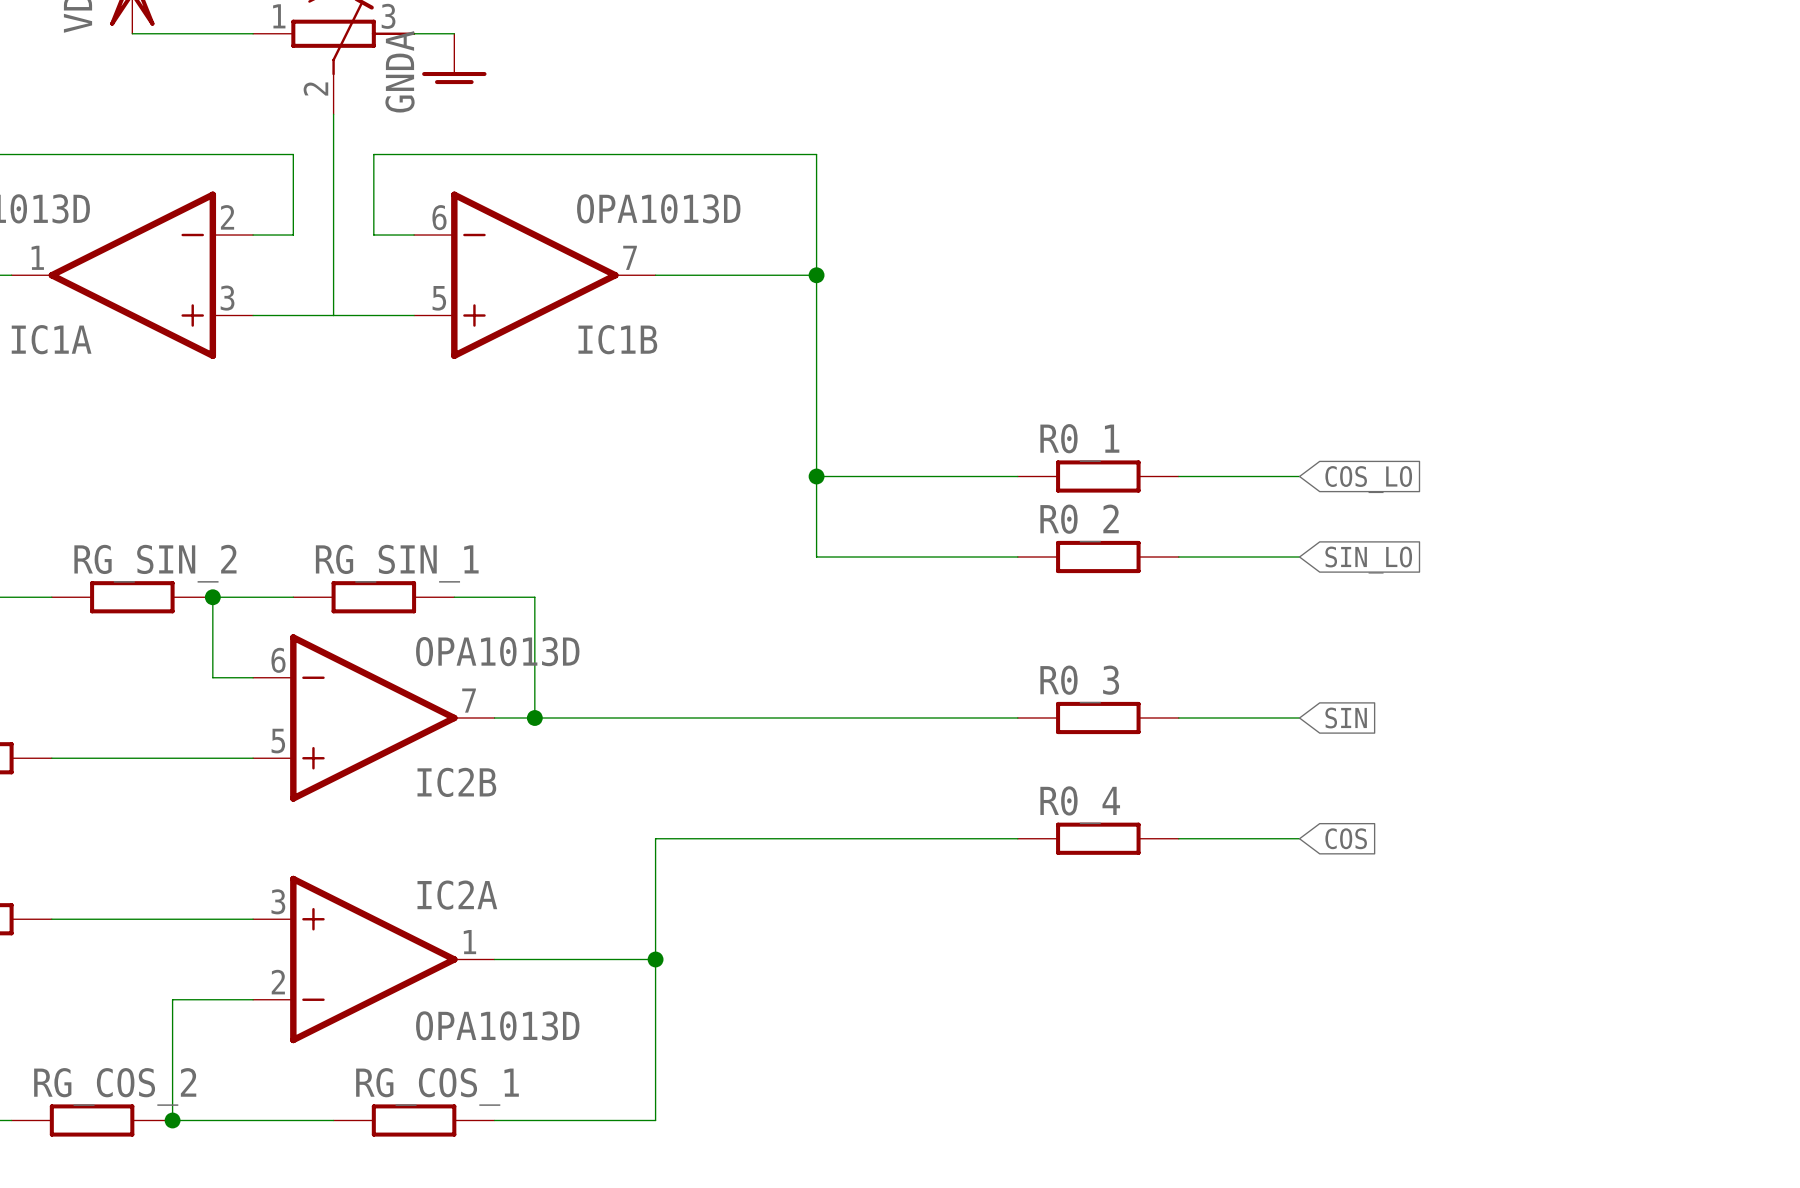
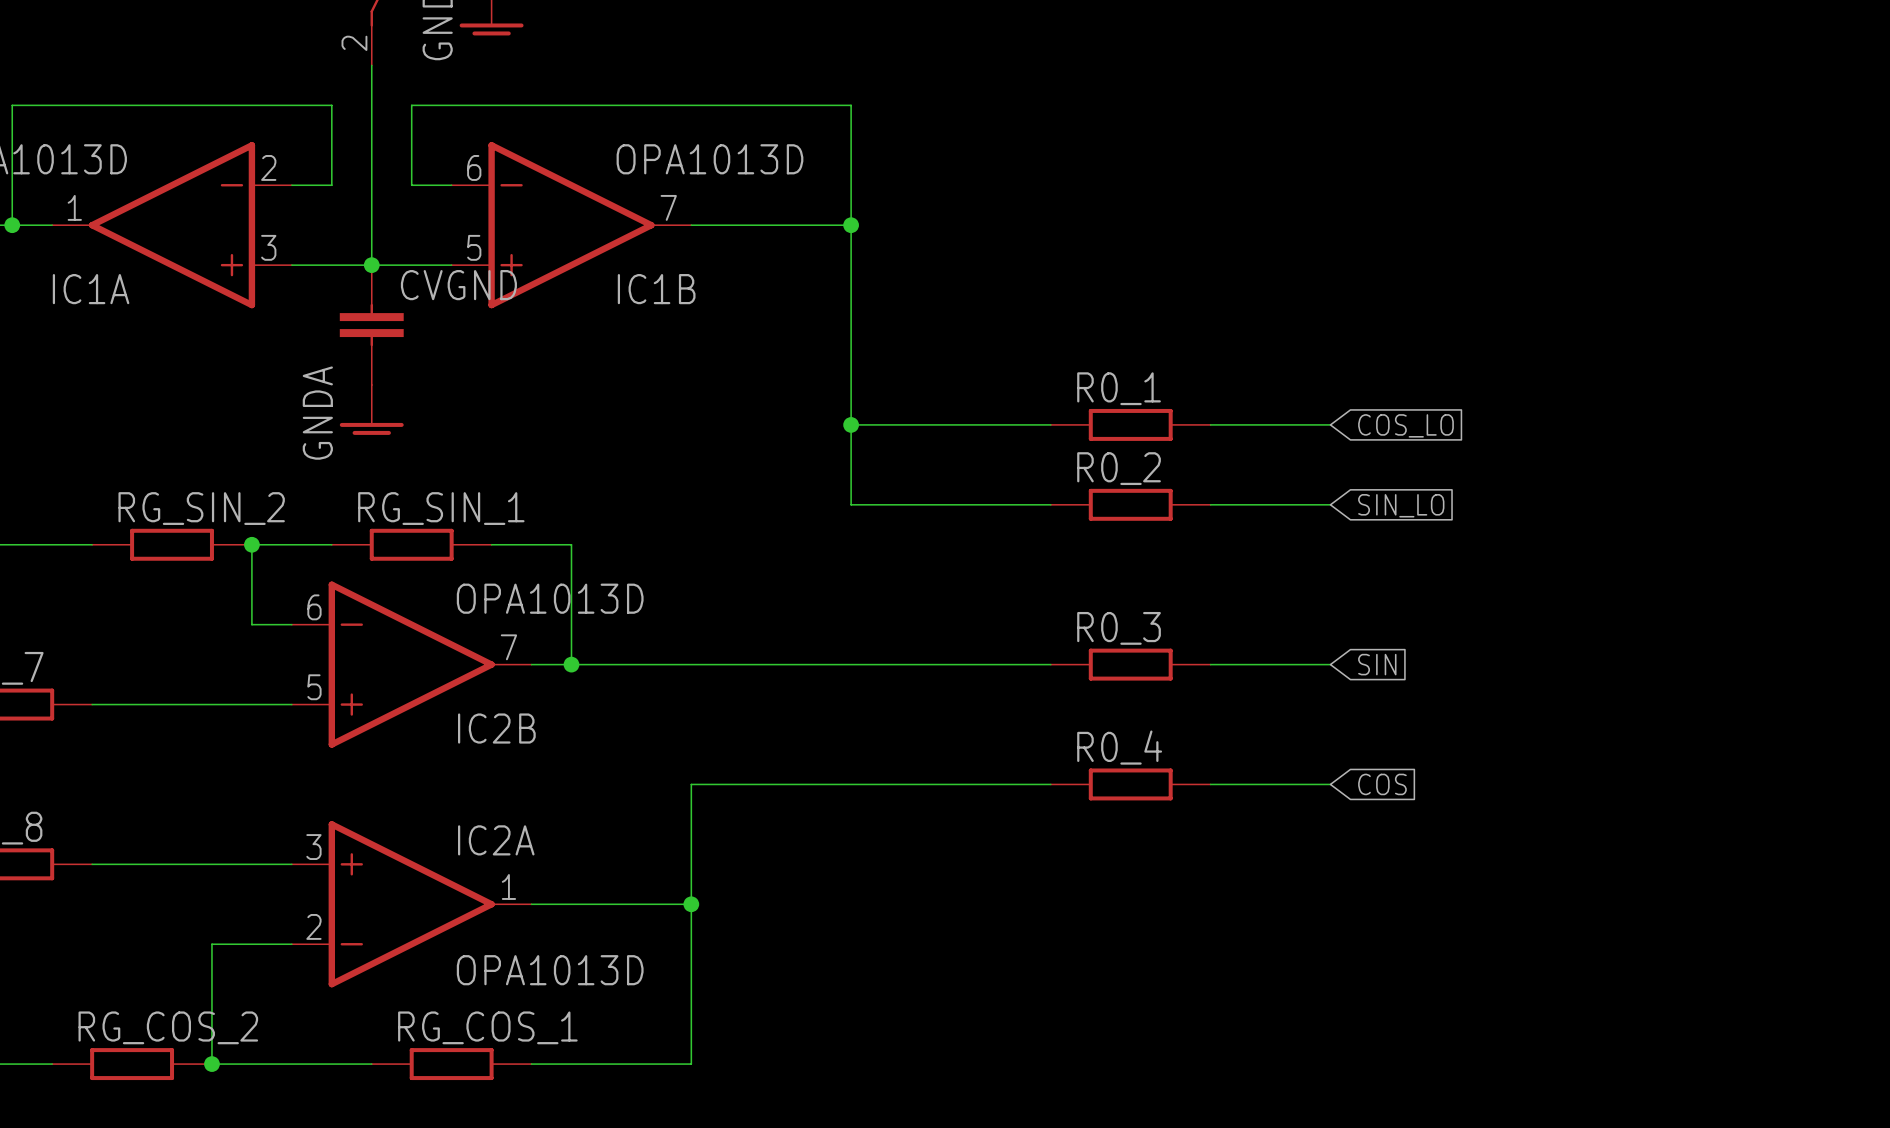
junction: none -> (371, 265)
CVGND: none -> (371, 325)
power symbol: none -> GNDA (371, 409)

